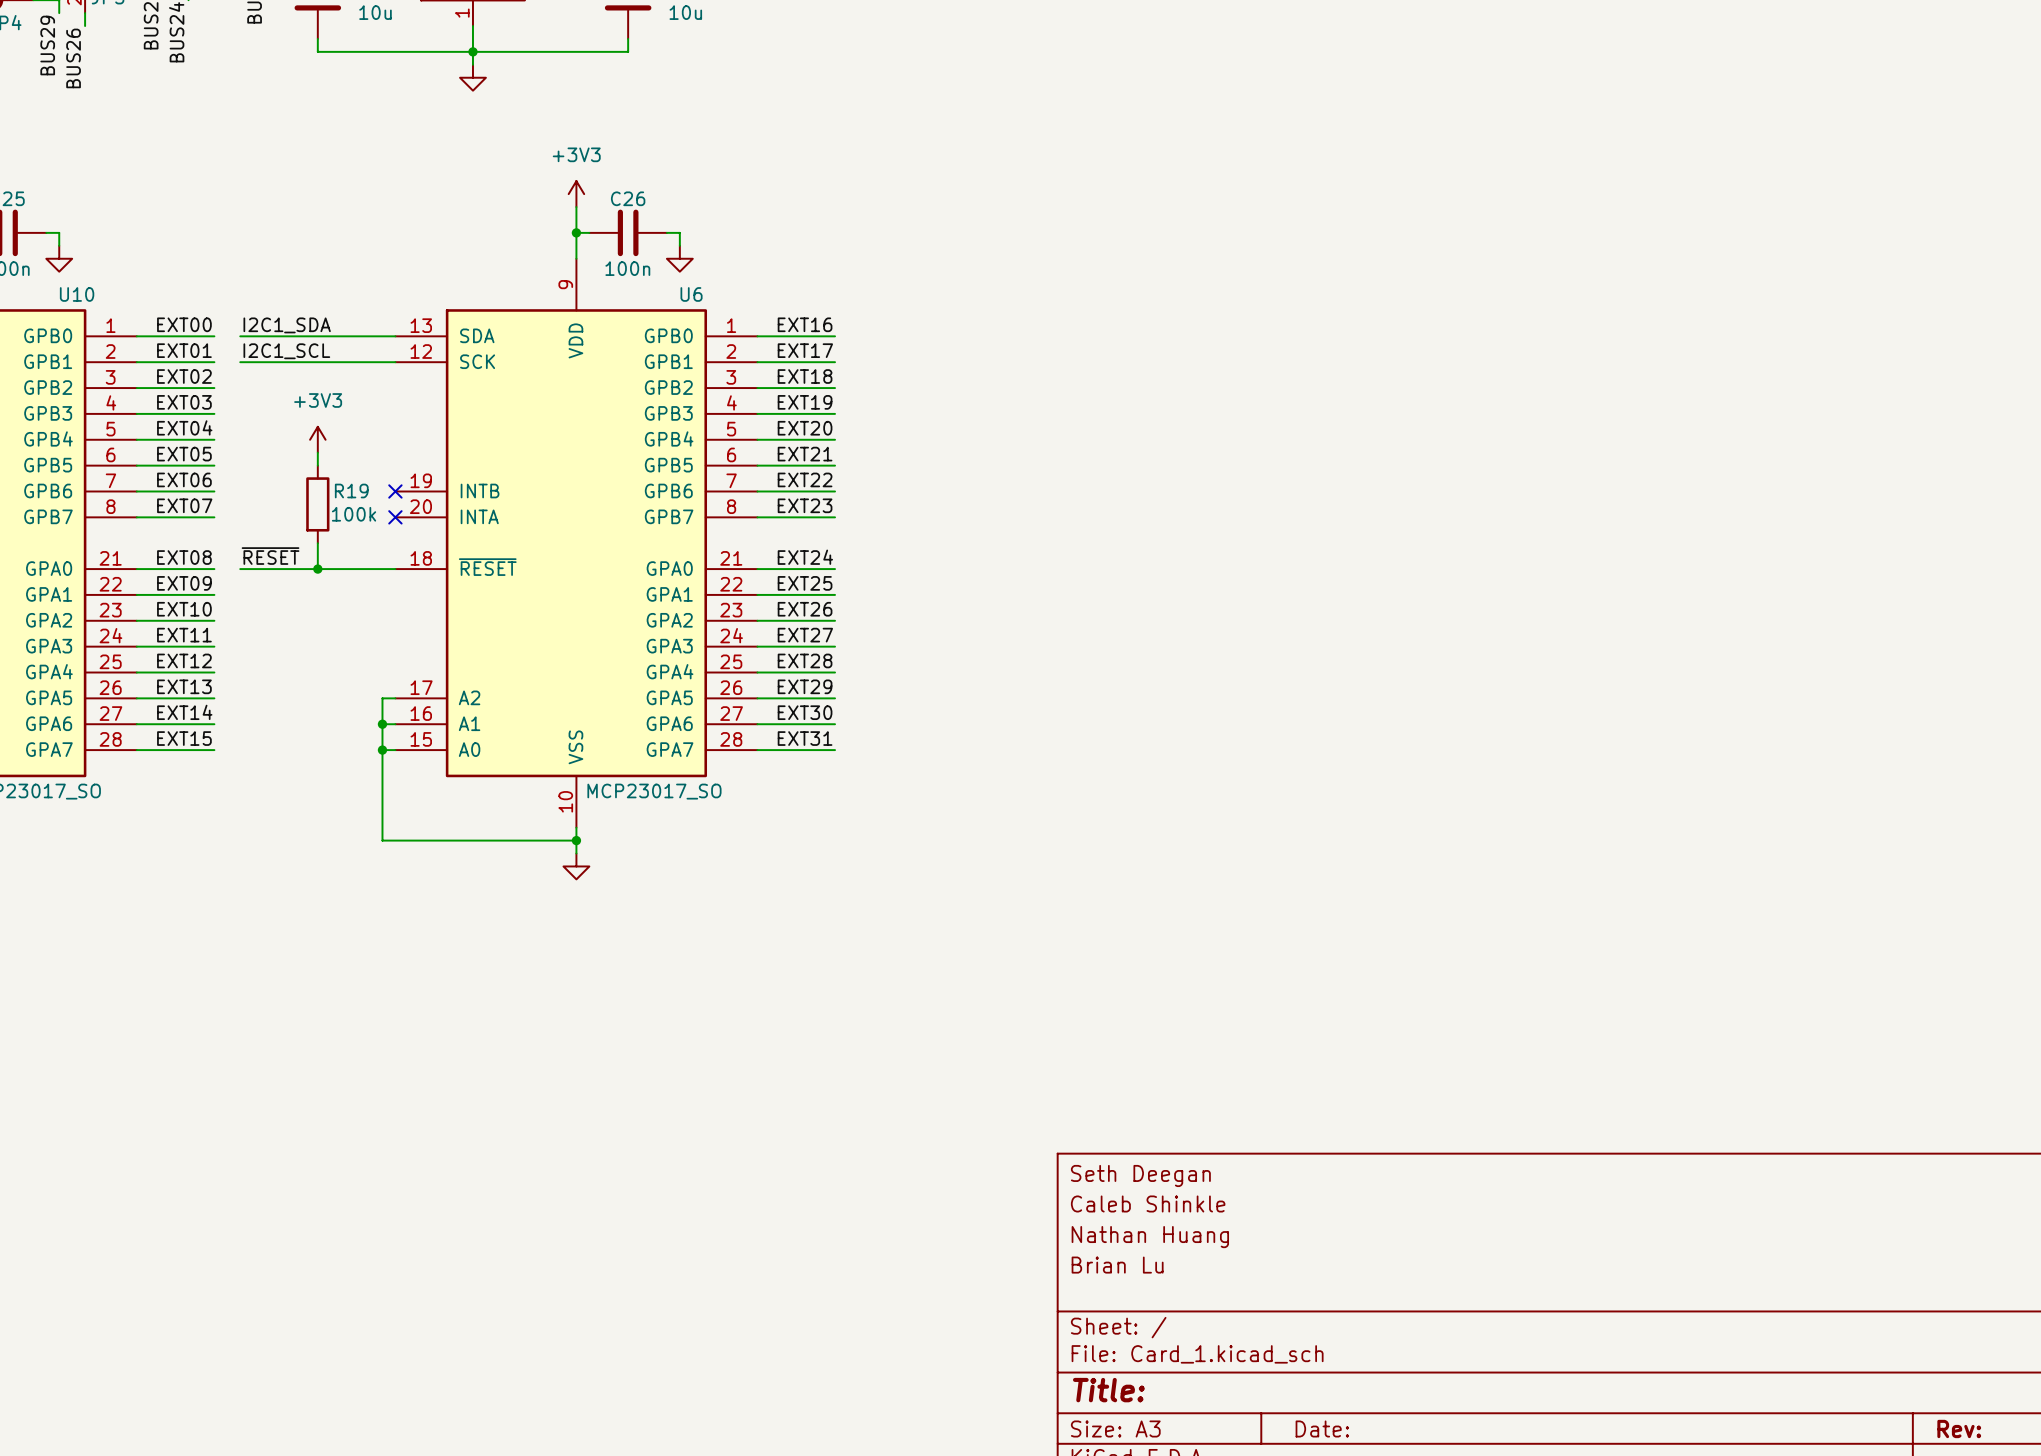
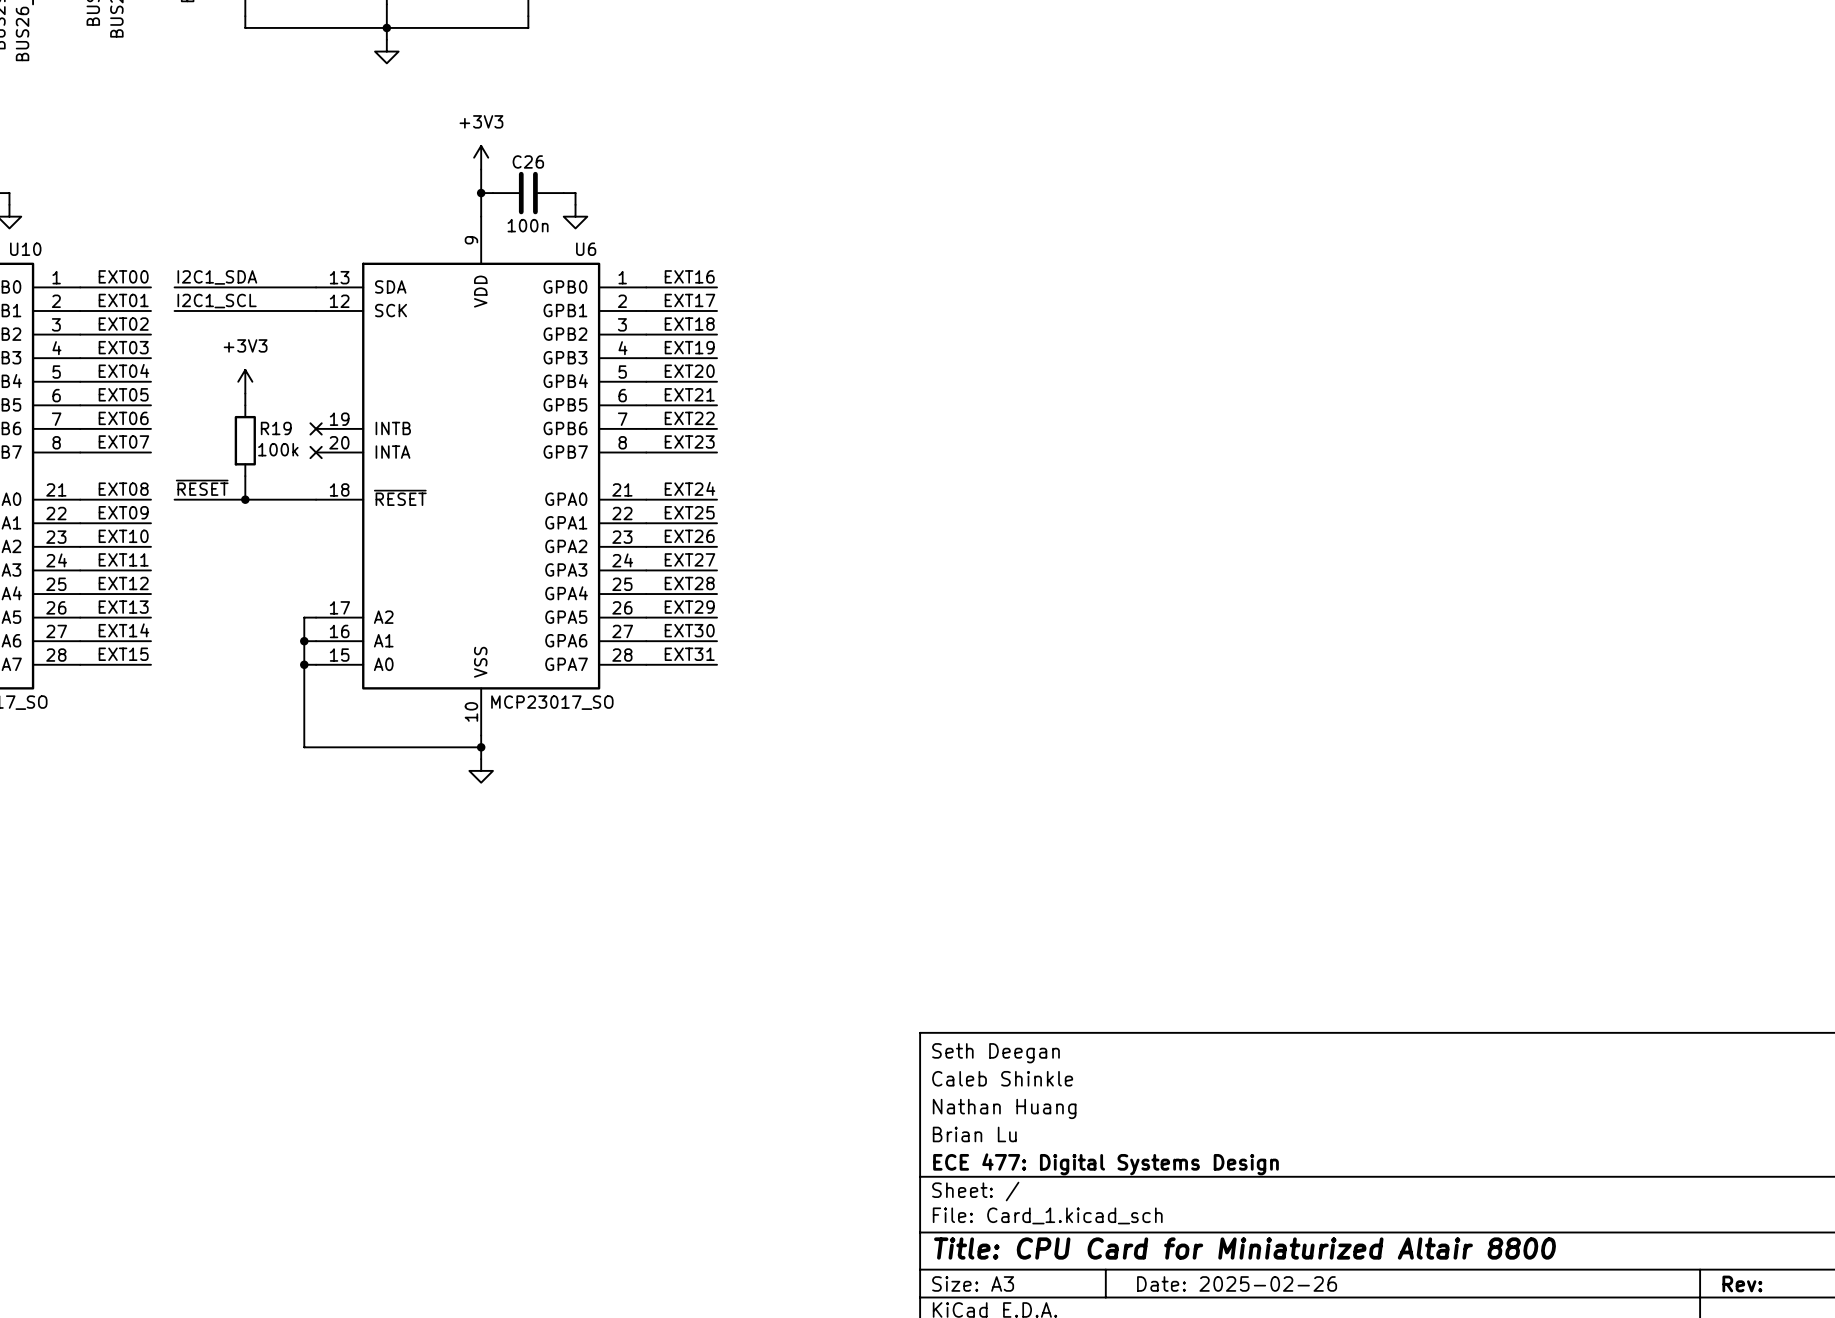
title block: none -> ECE 477: Digital Systems Design (1105, 1164)
title block: Title: (1108, 1390) -> Title: CPU Card for Miniaturized Altair 8800 (1245, 1248)
title block: Date: (1322, 1428) -> Date: 2025-02-26 (1237, 1283)

